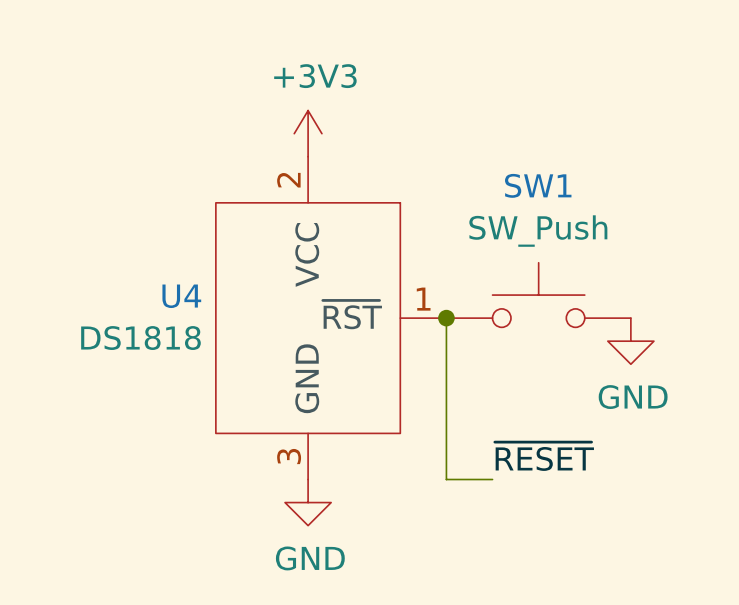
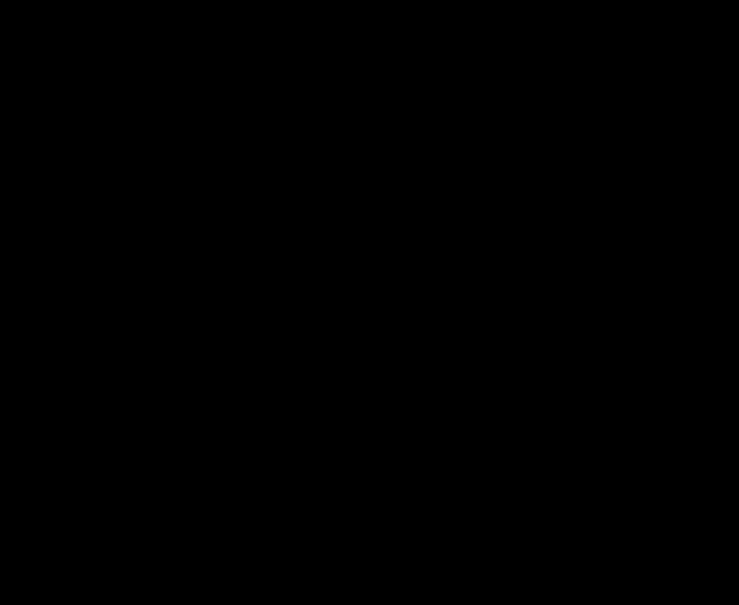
power symbol: +3V3 (308, 133) -> none
SW1: SW_Push (538, 295) -> none
U4: DS1818 (331, 318) -> none
wire: (446, 318) (446, 479) (492, 479) -> none
junction: (446, 318) -> none
power symbol: GND (630, 341) -> none
label: ~{RESET} (544, 456) -> none
power symbol: GND (308, 502) -> none

